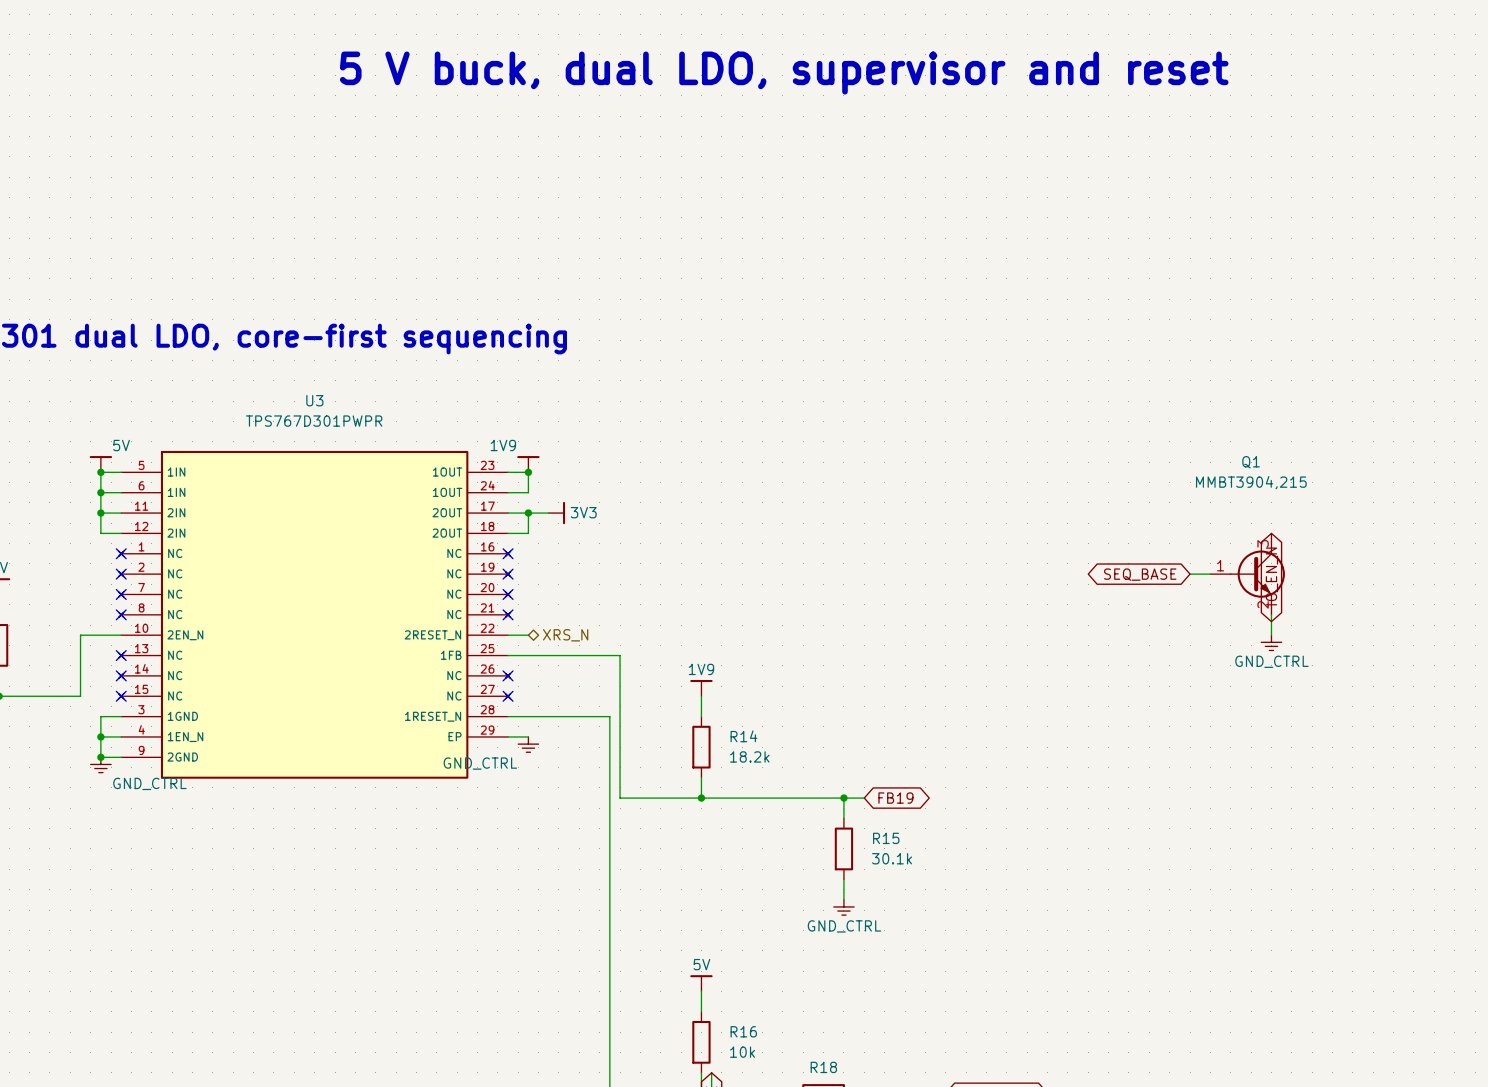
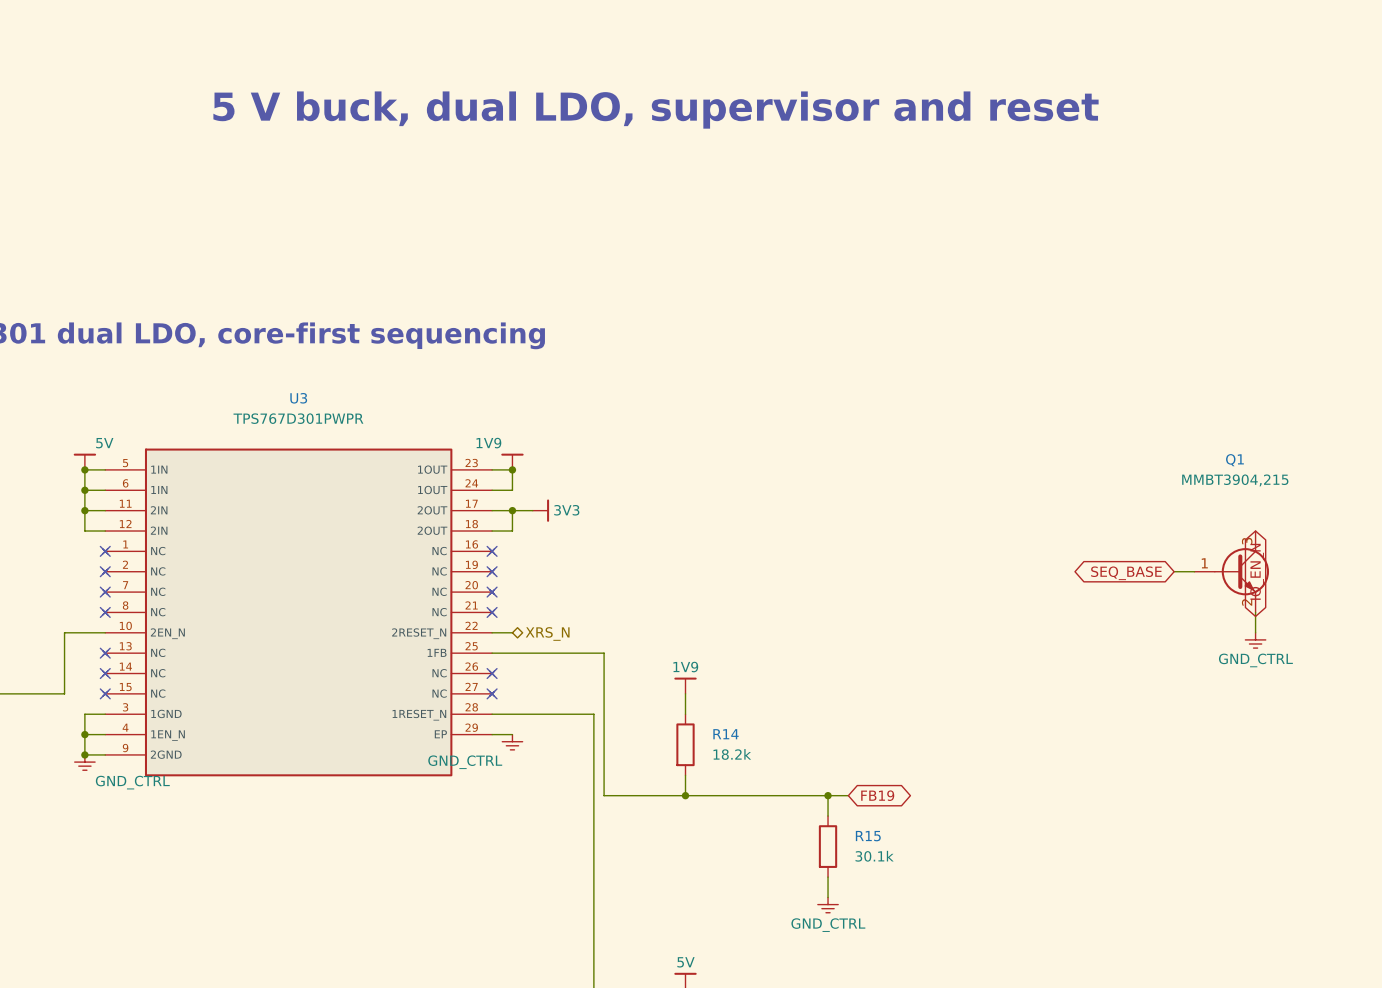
text position: 5 V buck, dual LDO, supervisor and reset (784, 73) -> 5 V buck, dual LDO, supervisor and reset (656, 110)

